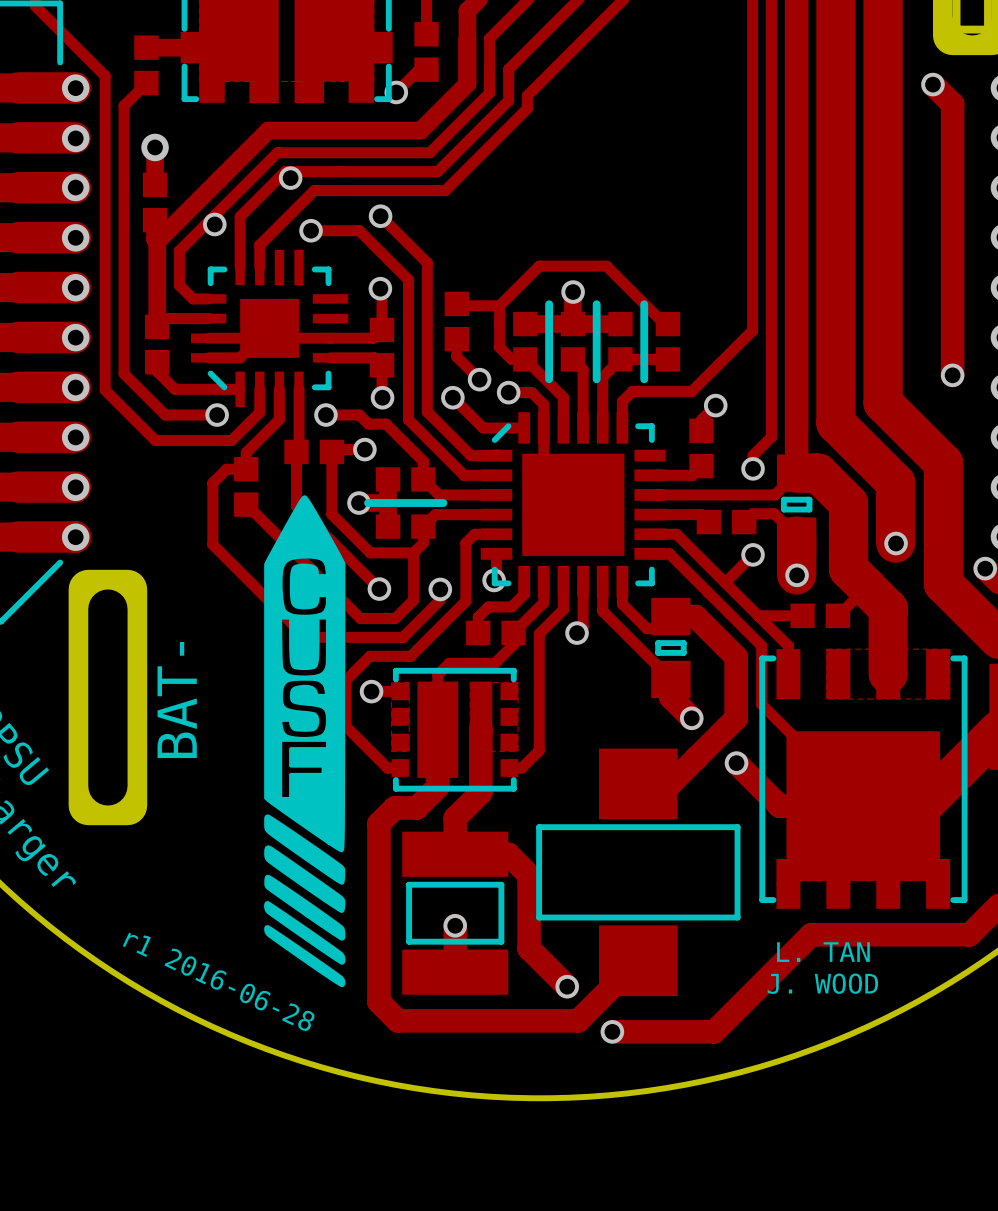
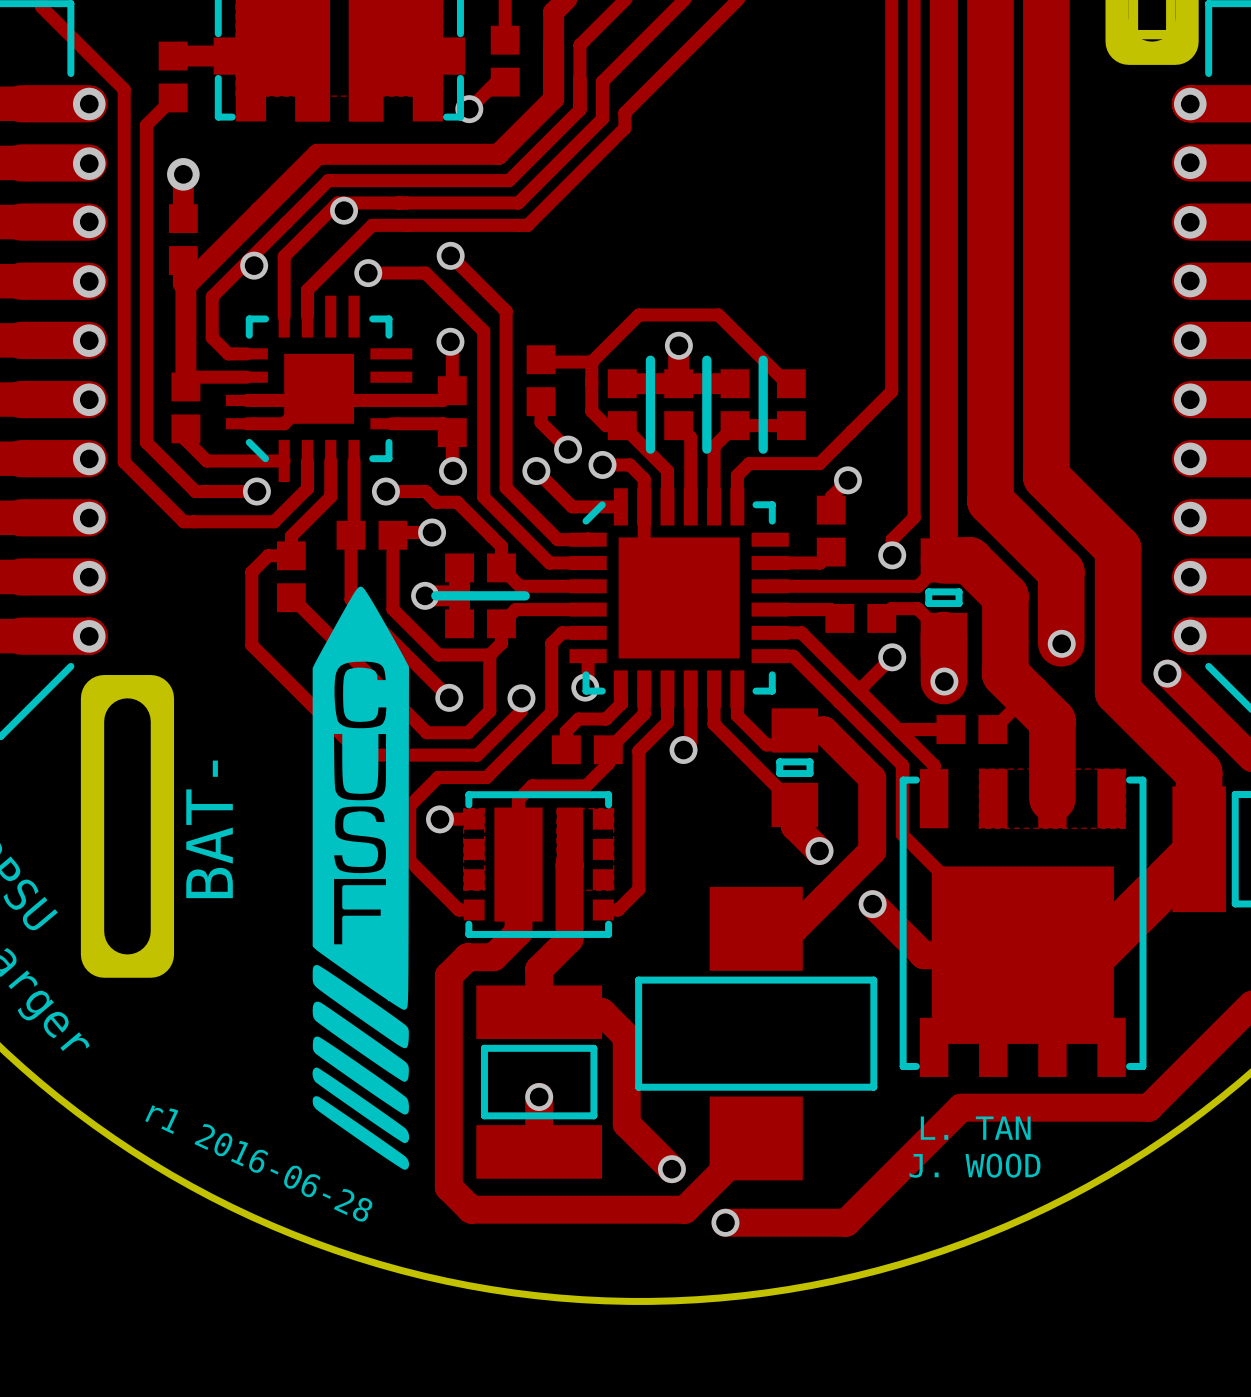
track: (932, 84) (952, 104) (952, 375) -> none
via: (932, 84) -> none
via: (952, 375) -> none

